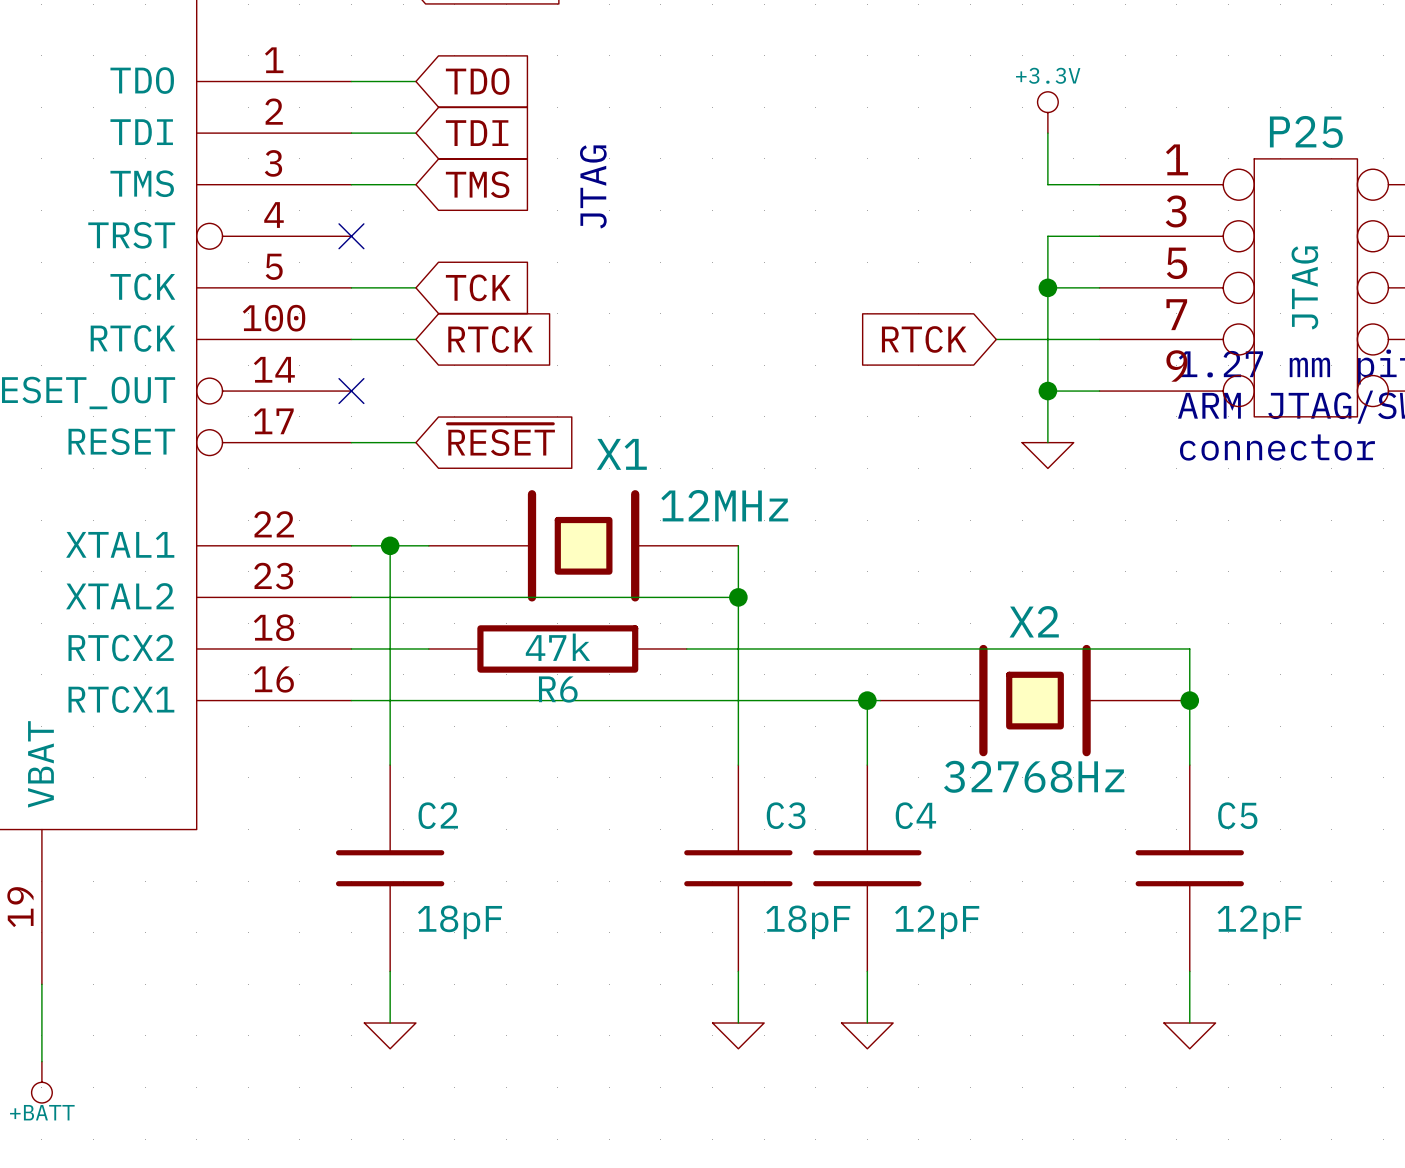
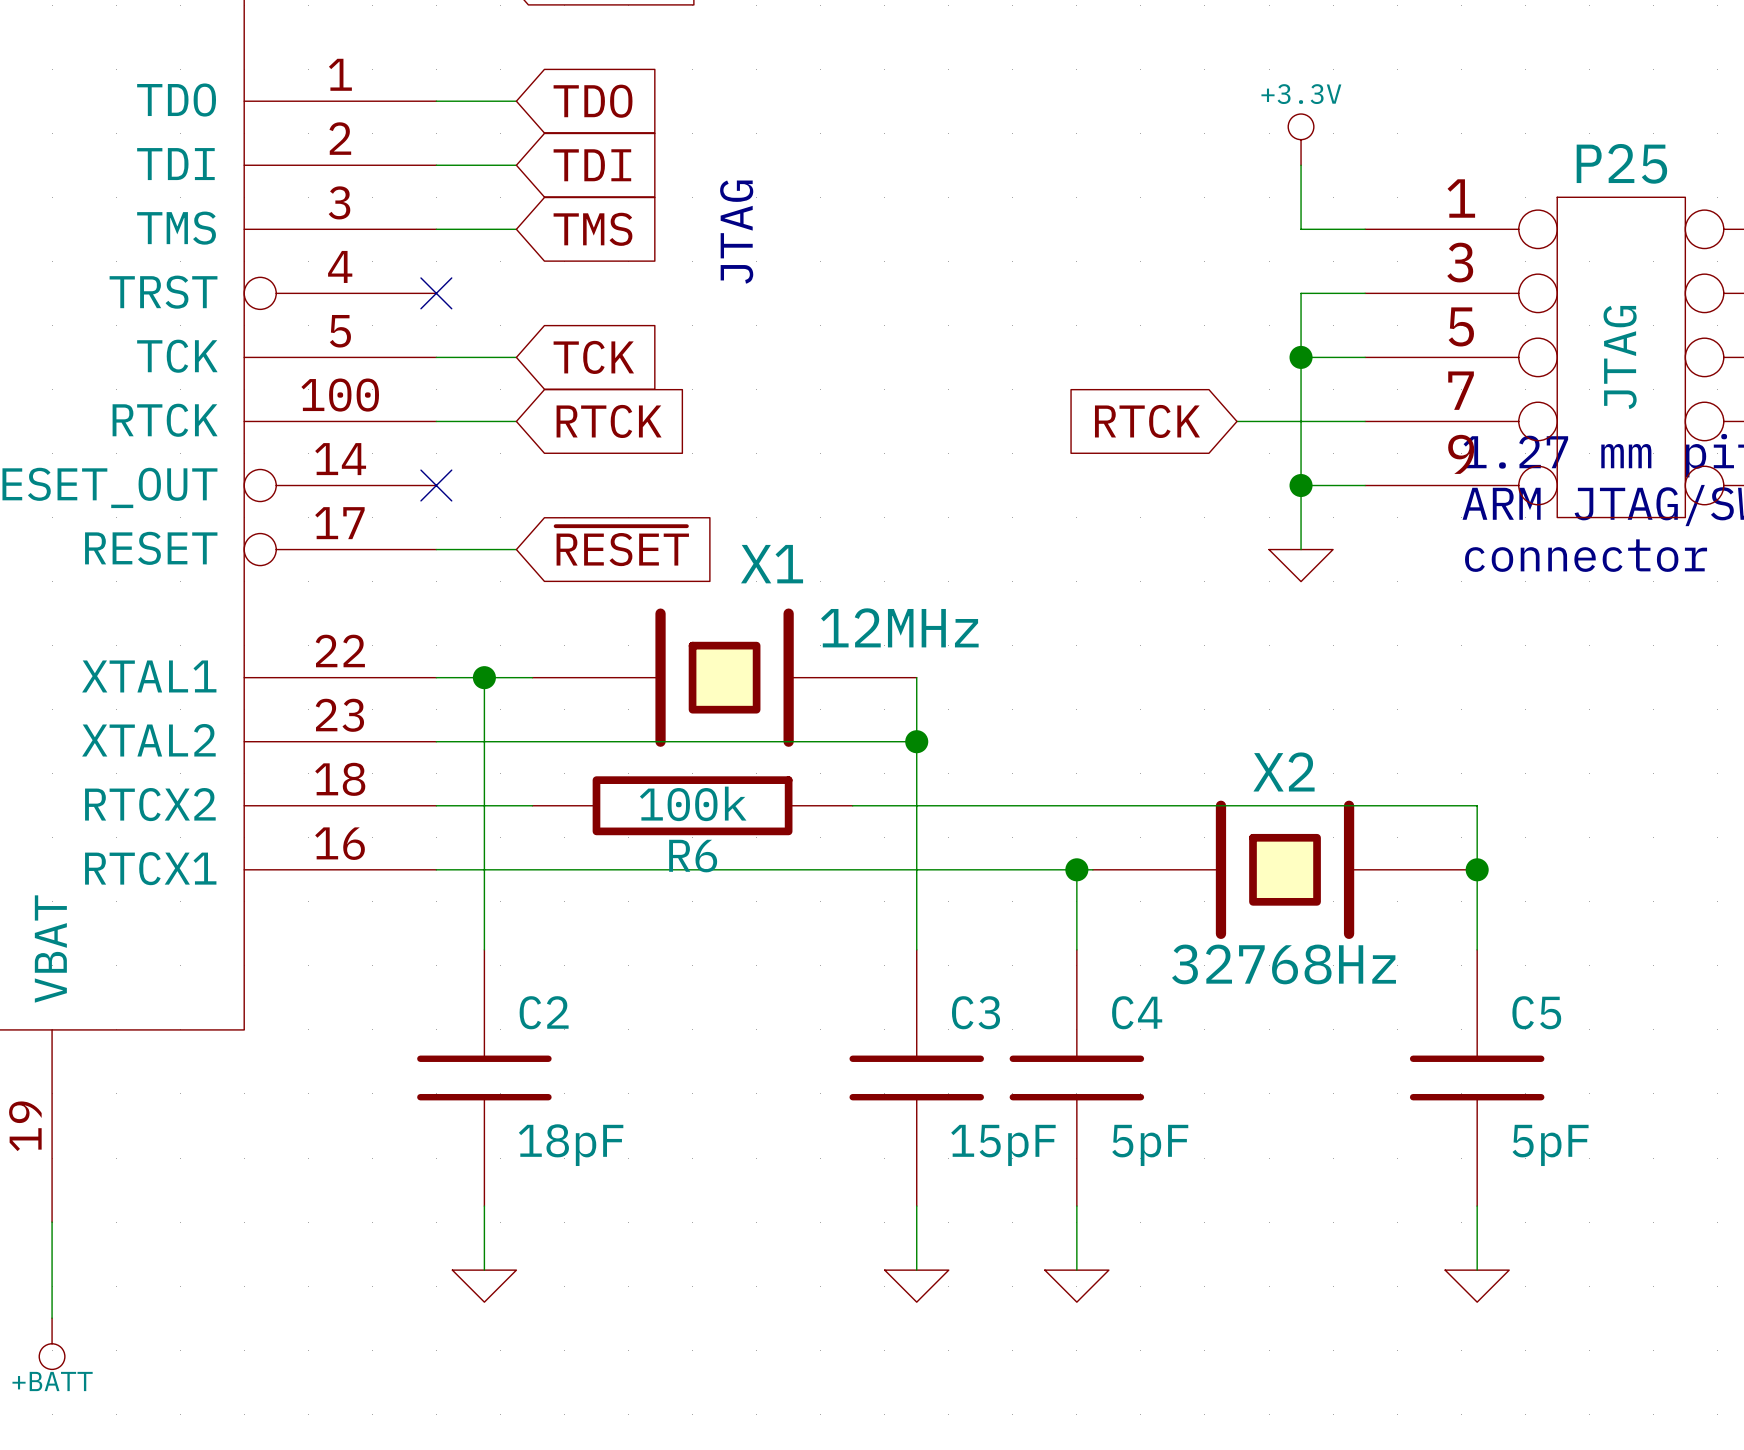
R6 value: 47k (557, 647) -> 100k (693, 803)
C3 value: 18pF (808, 922) -> 15pF (1003, 1145)
C4 value: 12pF (937, 922) -> 5pF (1150, 1145)
C5 value: 12pF (1259, 922) -> 5pF (1550, 1145)

